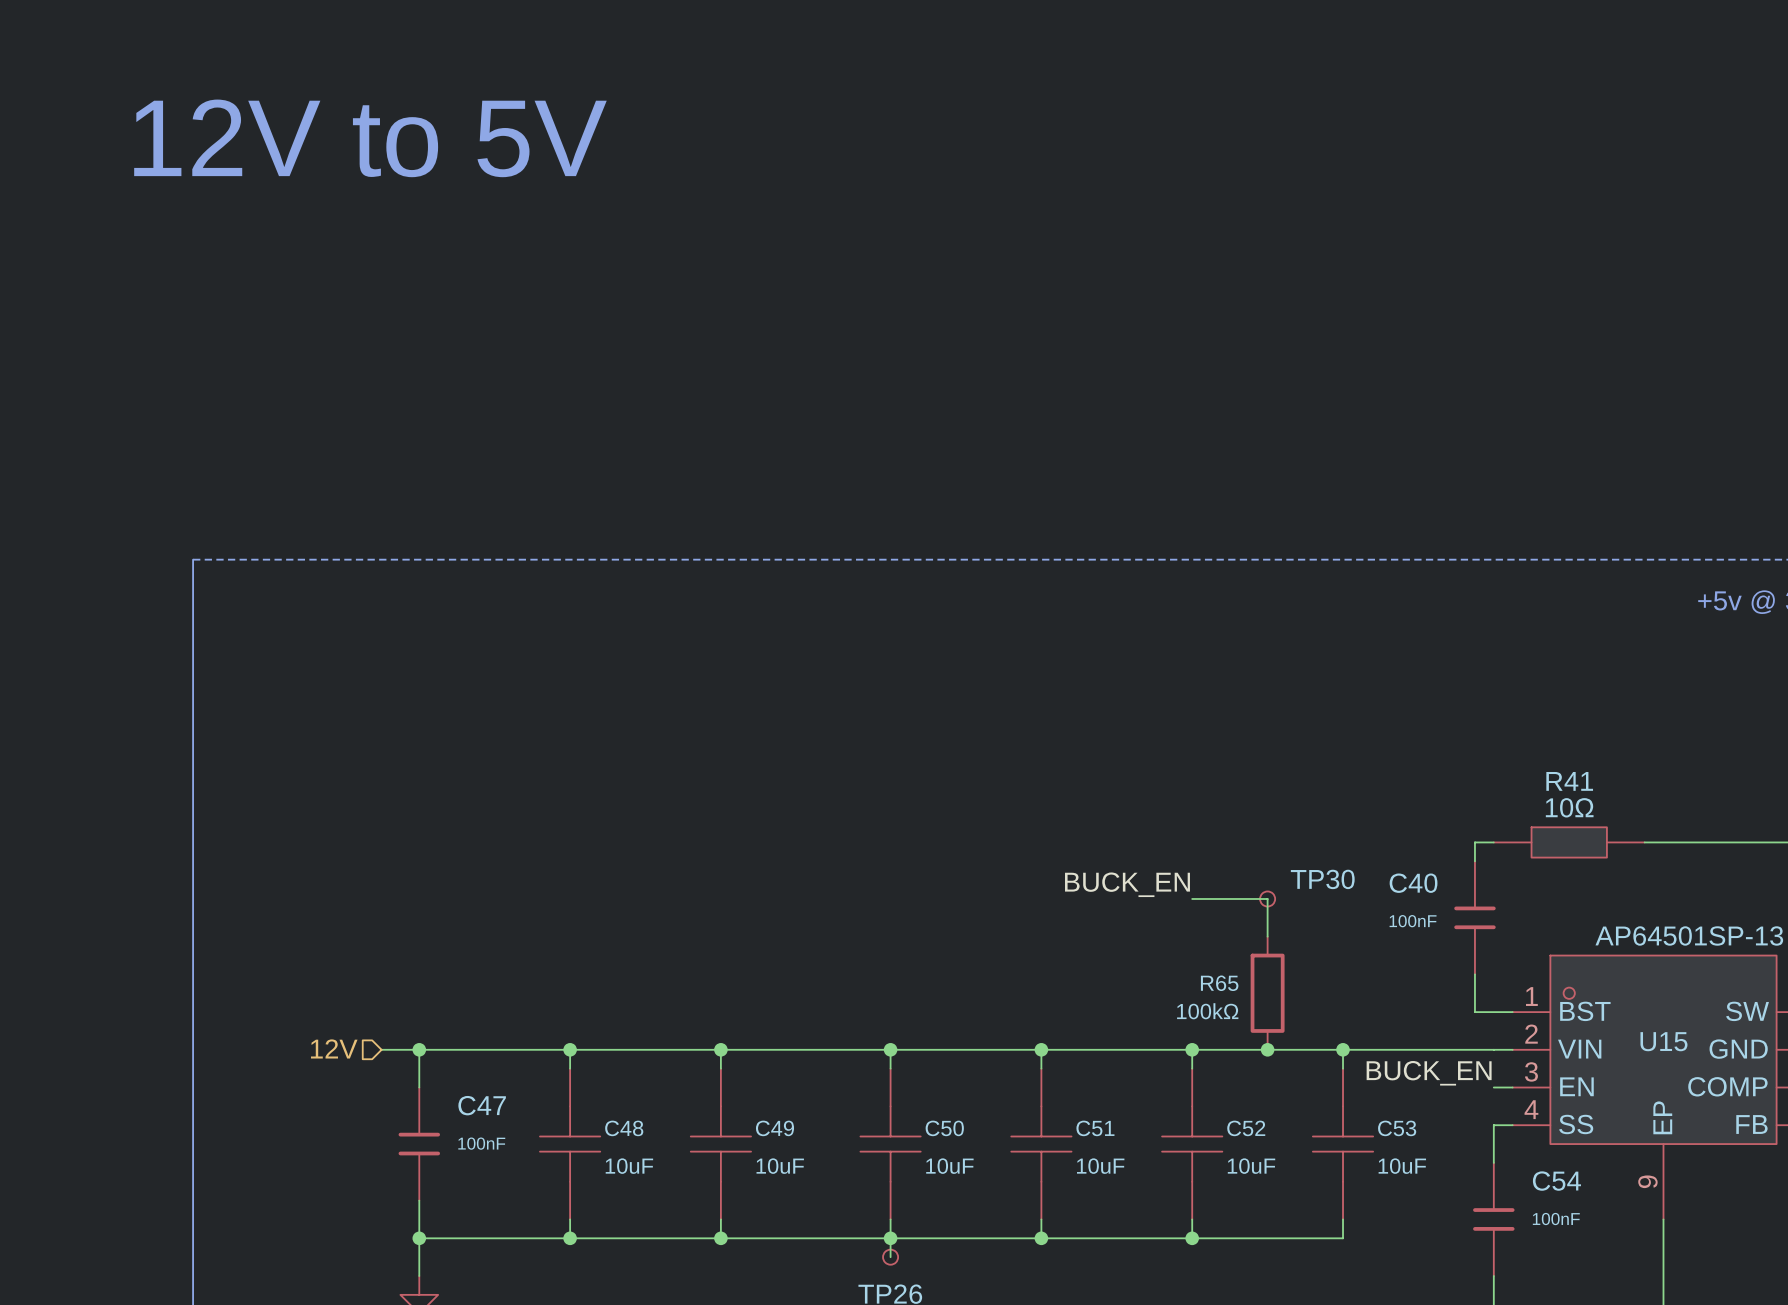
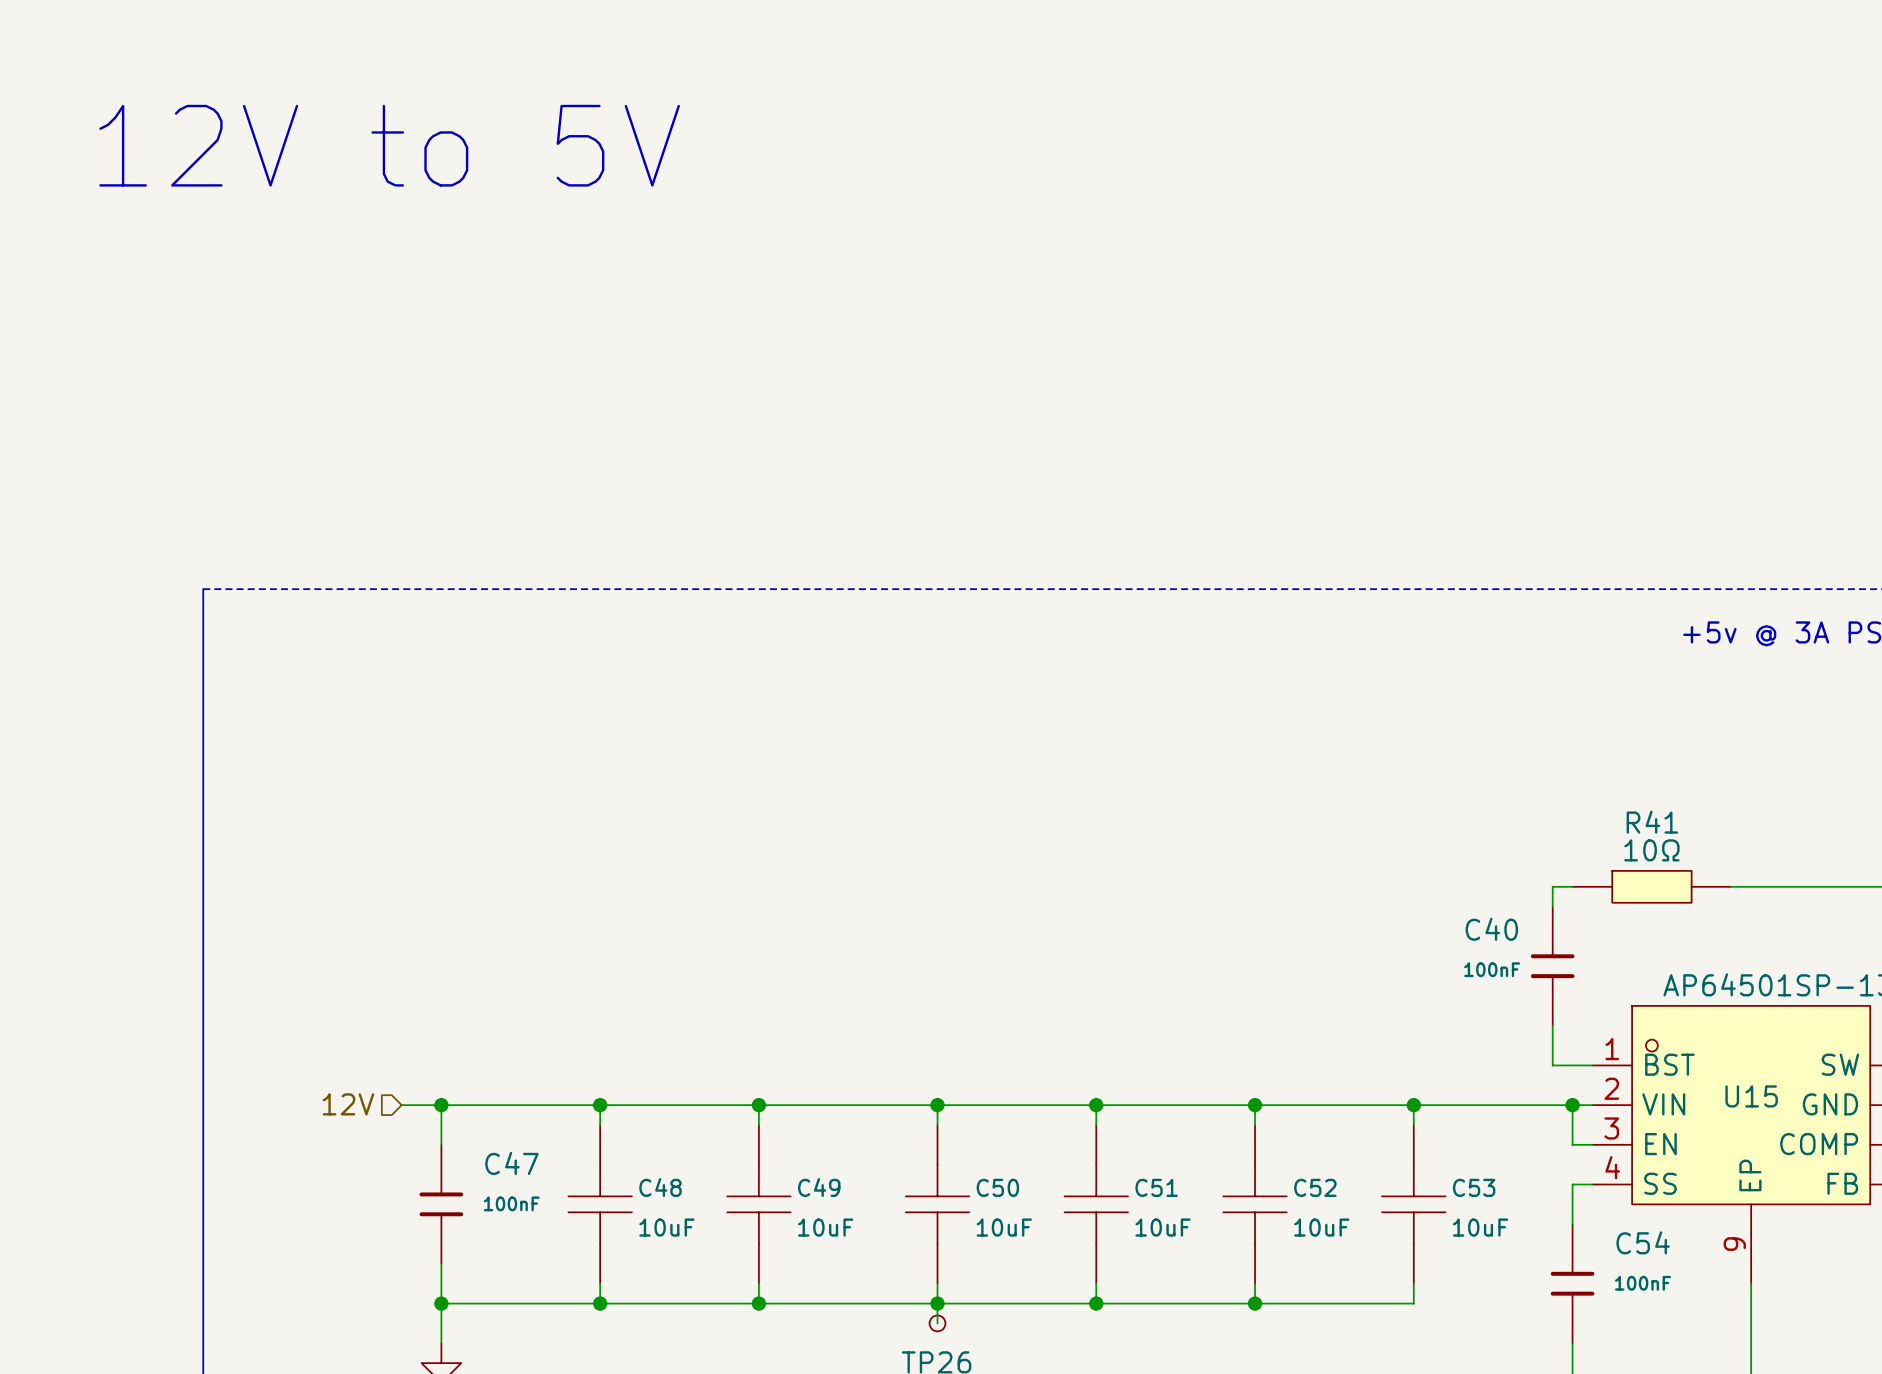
label: BUCK_EN (1127, 884) -> none
wire: (1192, 898) (1267, 898) (1267, 936) -> none
TP30: (1267, 898) -> none
R65: 100kΩ (1267, 993) -> none
junction: (1267, 1049) -> none
wire: none -> (1572, 1105) (1572, 1144)
junction: none -> (1572, 1105)
label: BUCK_EN (1429, 1073) -> none

